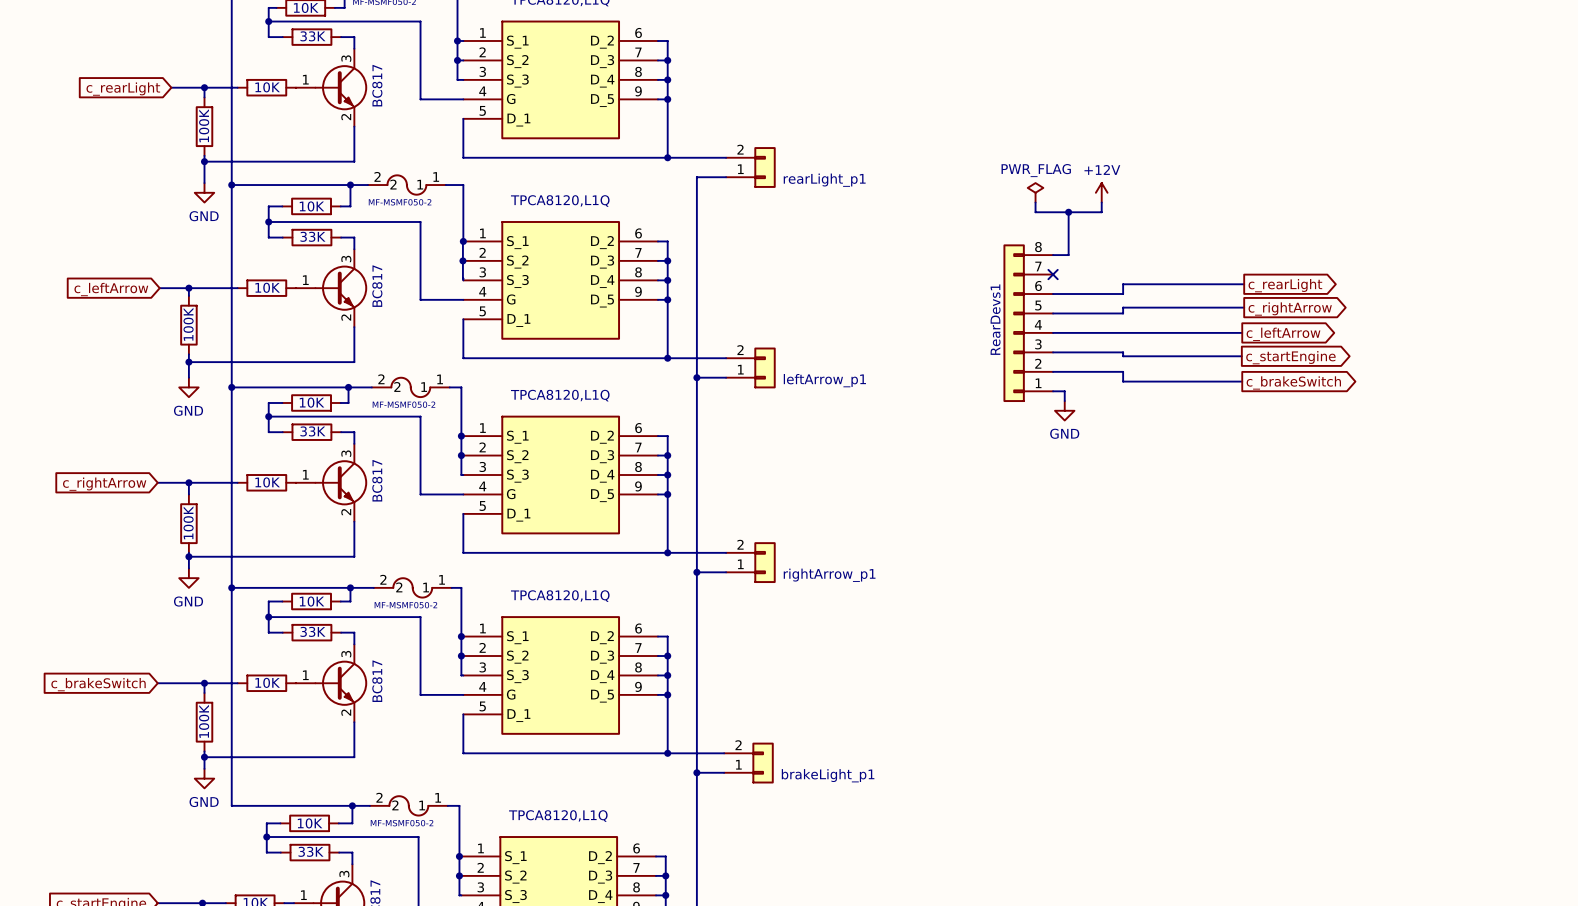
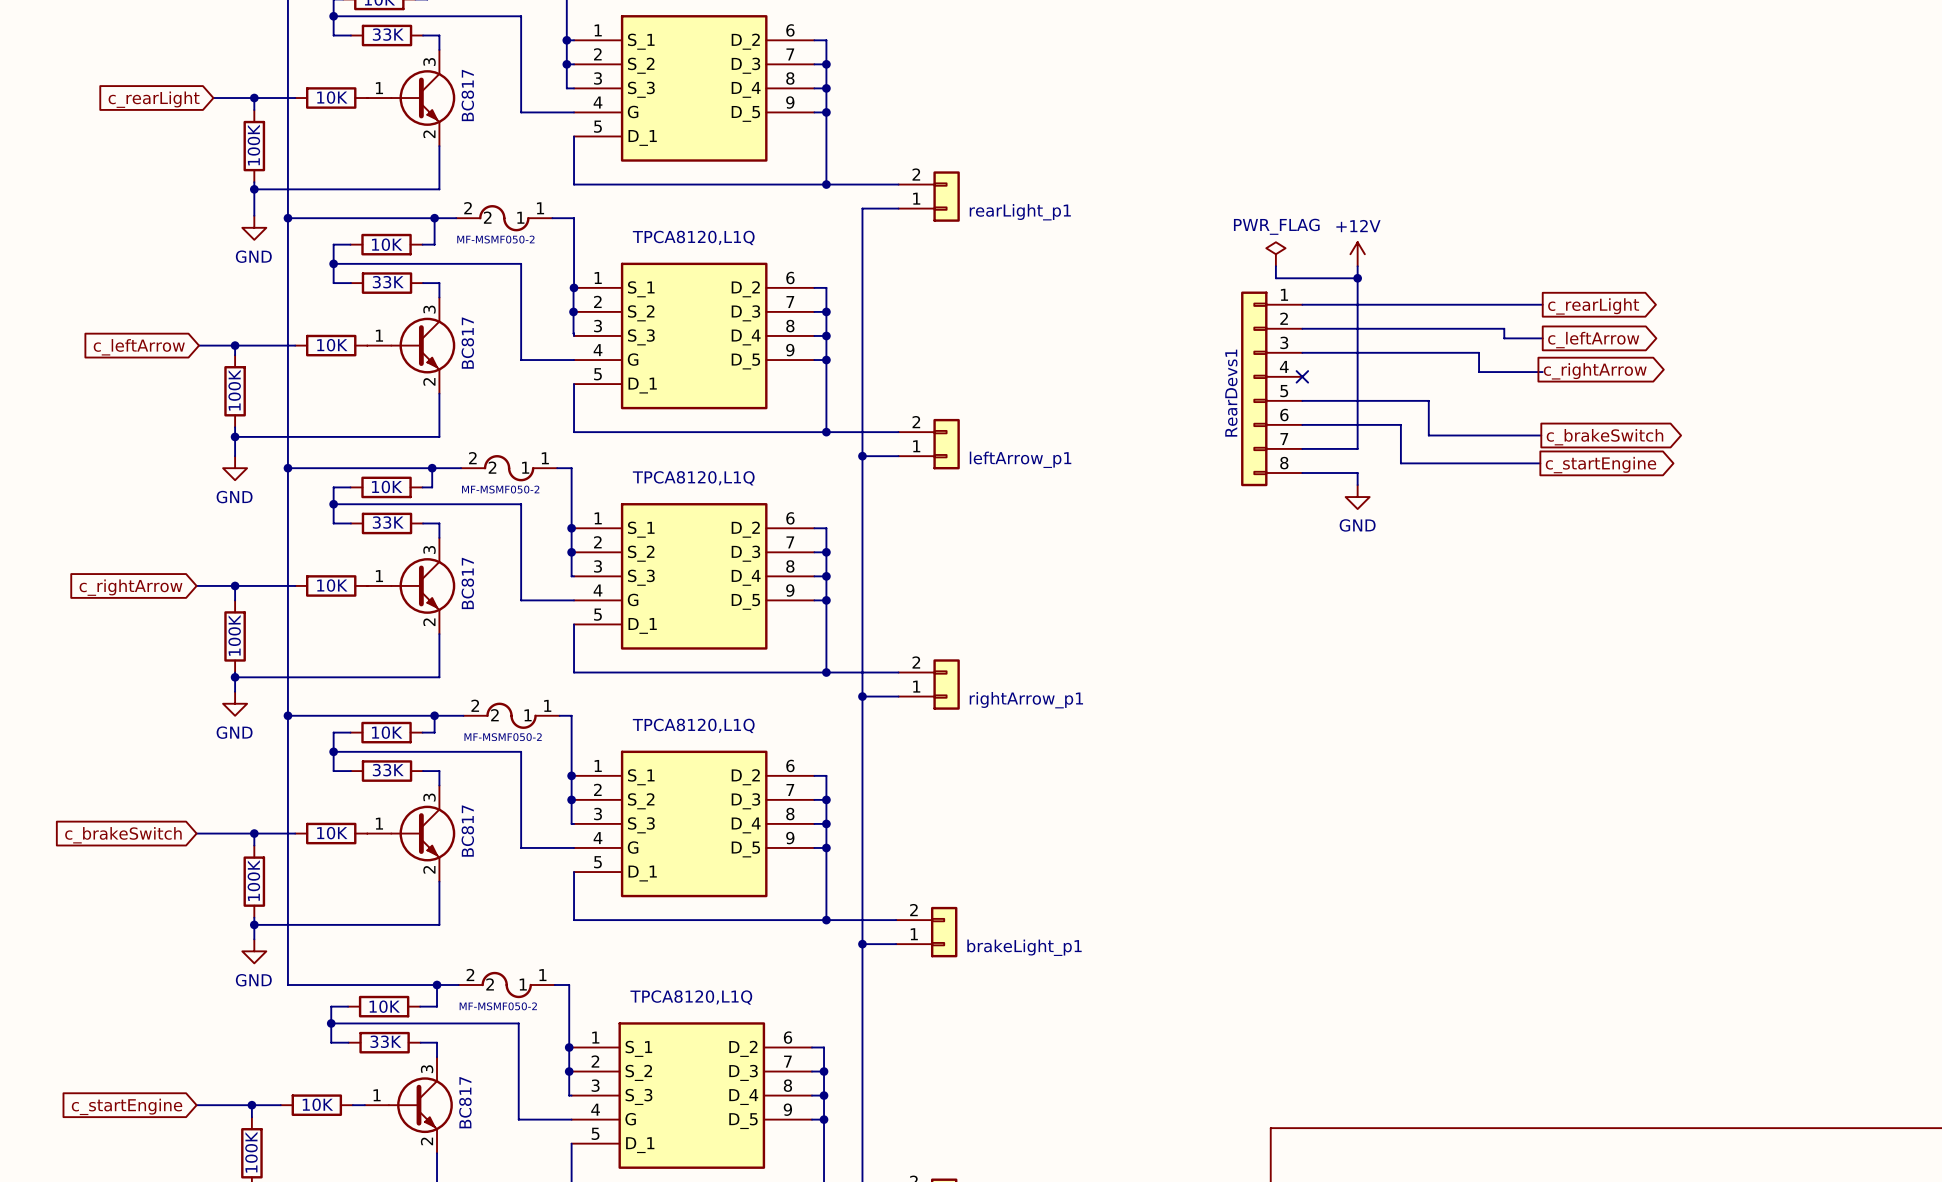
power symbol position: PWR_FLAG (1035, 192) -> PWR_FLAG (1275, 254)
power symbol position: +12V (1101, 192) -> +12V (1357, 254)
wire: (1035, 202) (1035, 212) (1101, 212) (1101, 202) -> none
wire: (1068, 212) (1068, 255) -> (1542, 304) (1321, 304)
junction position: (1068, 212) -> (1357, 278)
wire: none -> (1275, 266) (1275, 278) (1357, 278)
wire: none -> (1302, 328) (1504, 328) (1504, 338) (1542, 338)
no-connect mark position: (1053, 274) -> (1302, 376)
wire: (1244, 284) (1123, 284) (1123, 294) -> (1542, 372) (1479, 372) (1479, 352) (1388, 352)
global label position: c_rearLight (1285, 285) -> c_rearLight (1593, 306)
wire: (1244, 307) (1123, 307) (1123, 313) (1053, 313) -> none
RearDevs1 flip: as is (1014, 323) -> up-down (1254, 388)
wire: (1155, 332) (1242, 332) -> (1428, 400) (1428, 435) (1541, 435)
global label position: c_leftArrow (1283, 334) -> c_leftArrow (1593, 340)
wire: (1123, 352) (1123, 356) (1241, 356) -> (1388, 424) (1400, 424) (1400, 463) (1540, 463)
global label position: c_startEngine (1290, 357) -> c_startEngine (1600, 465)
wire: (1097, 371) (1123, 371) (1123, 381) (1242, 381) -> (1357, 448) (1357, 266)
global label position: c_brakeSwitch (1293, 382) -> c_brakeSwitch (1604, 437)
wire: (1064, 391) (1064, 401) -> (1316, 472) (1357, 472) (1357, 485)
power symbol position: GND (1064, 410) -> GND (1357, 497)

